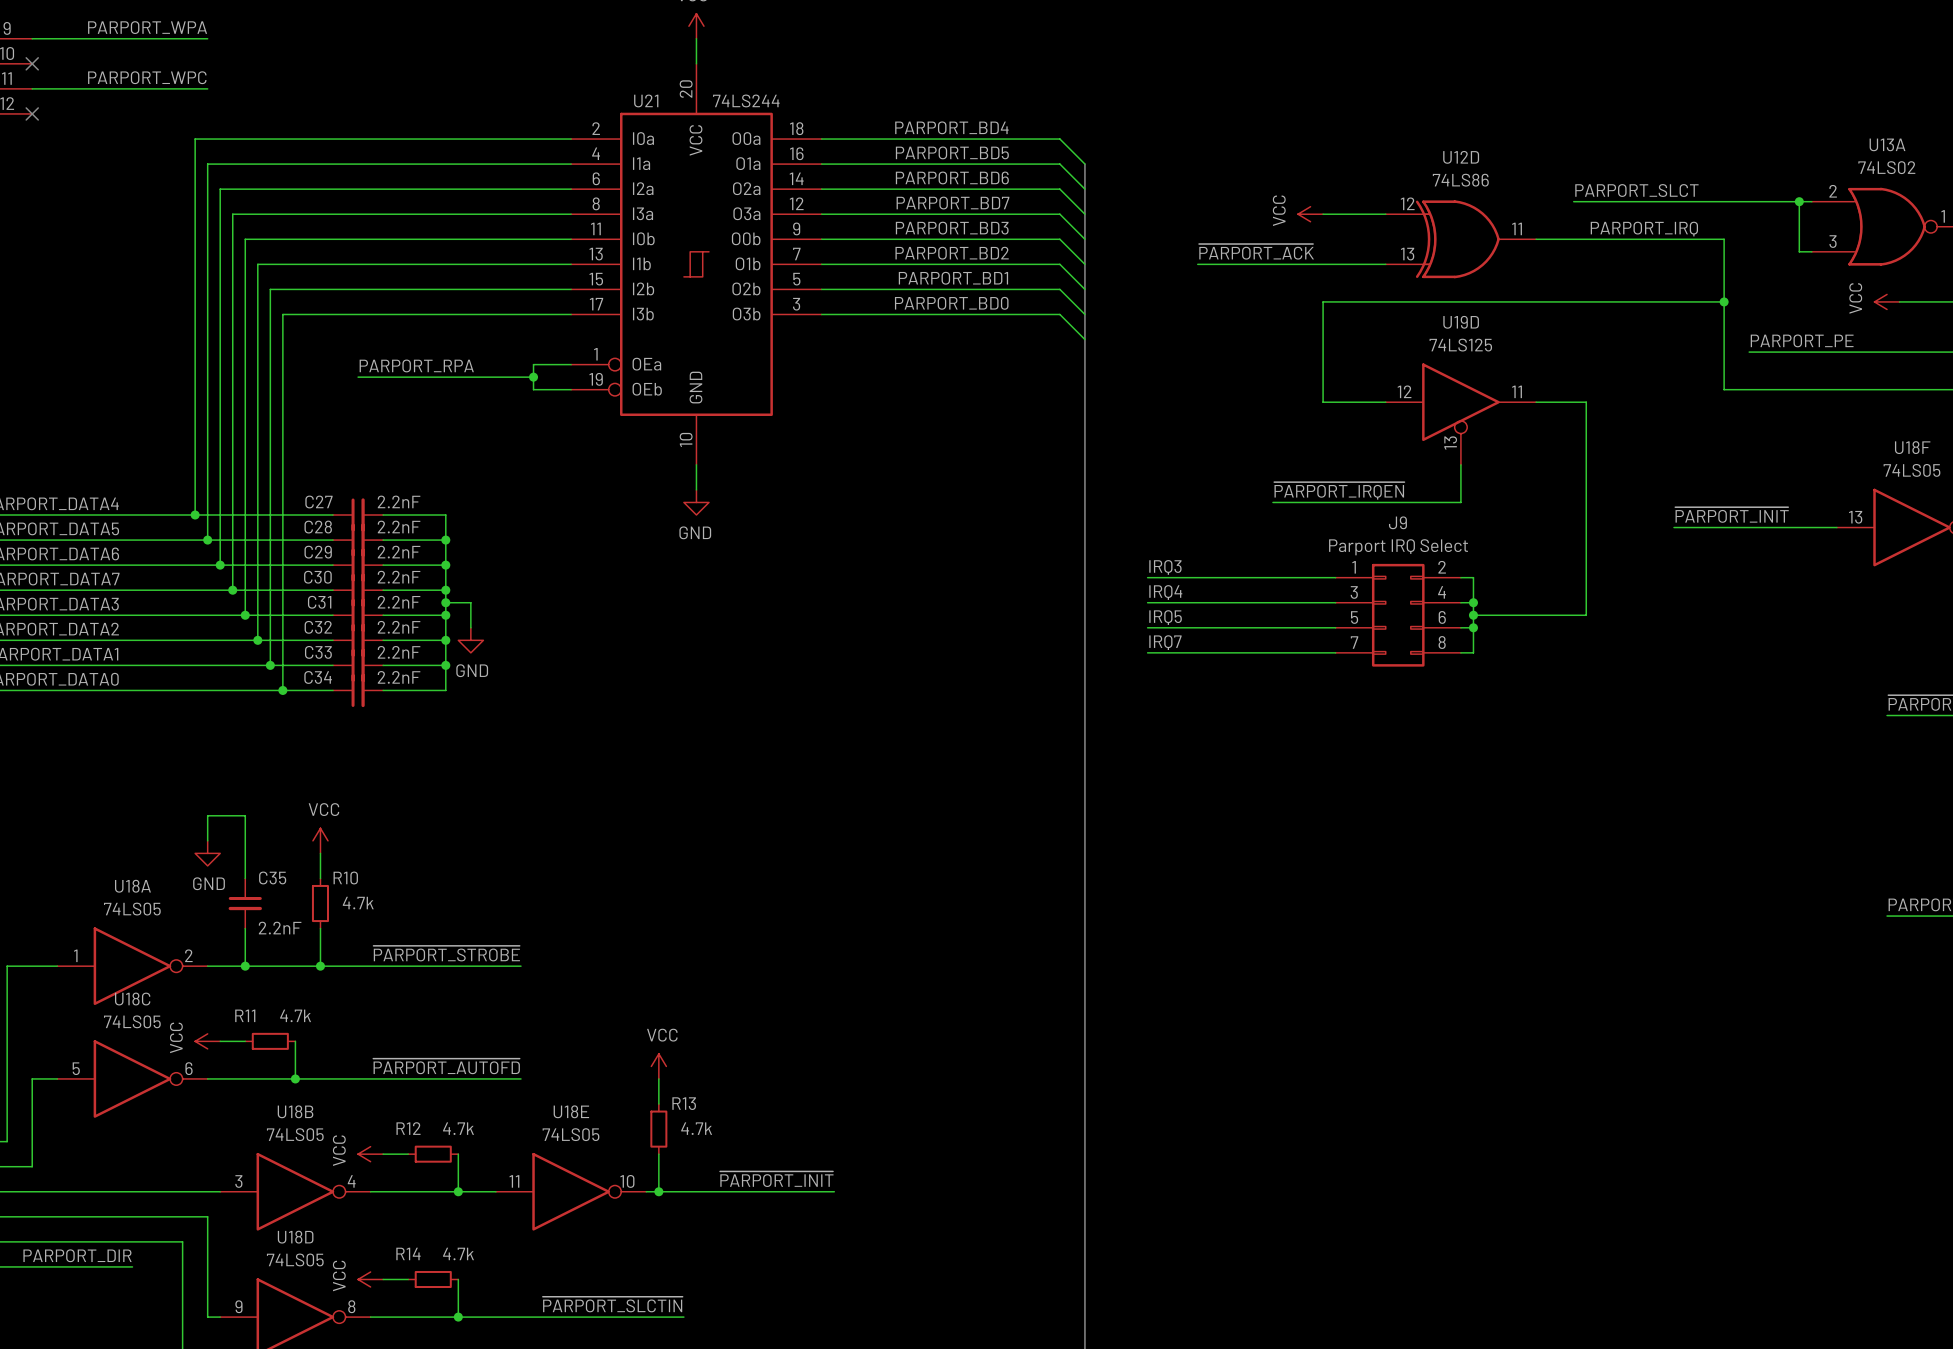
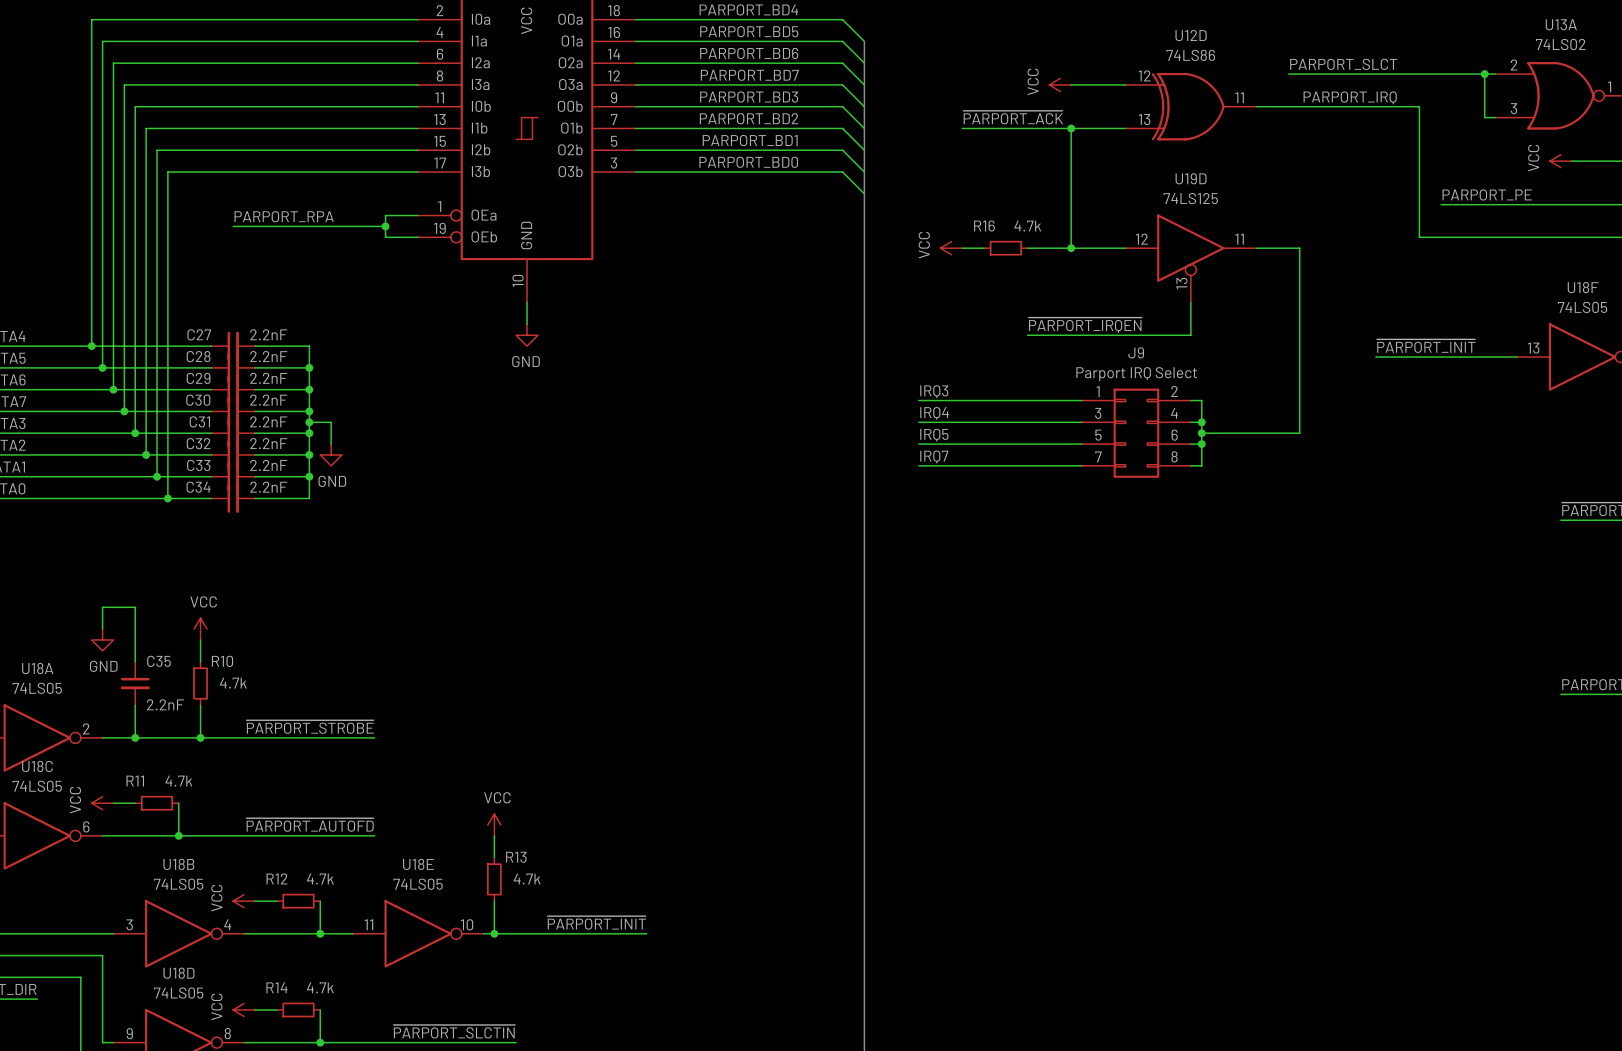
junction: none -> (1071, 128)
wire: (1323, 301) (1724, 301) -> (1071, 161) (1071, 128)
junction: (1724, 301) -> none
power symbol: none -> VCC (951, 248)
wire: none -> (962, 248) (984, 248)
R16: none -> 4.7k (1005, 248)
wire: none -> (1027, 248) (1071, 248)
junction: none -> (1071, 248)

